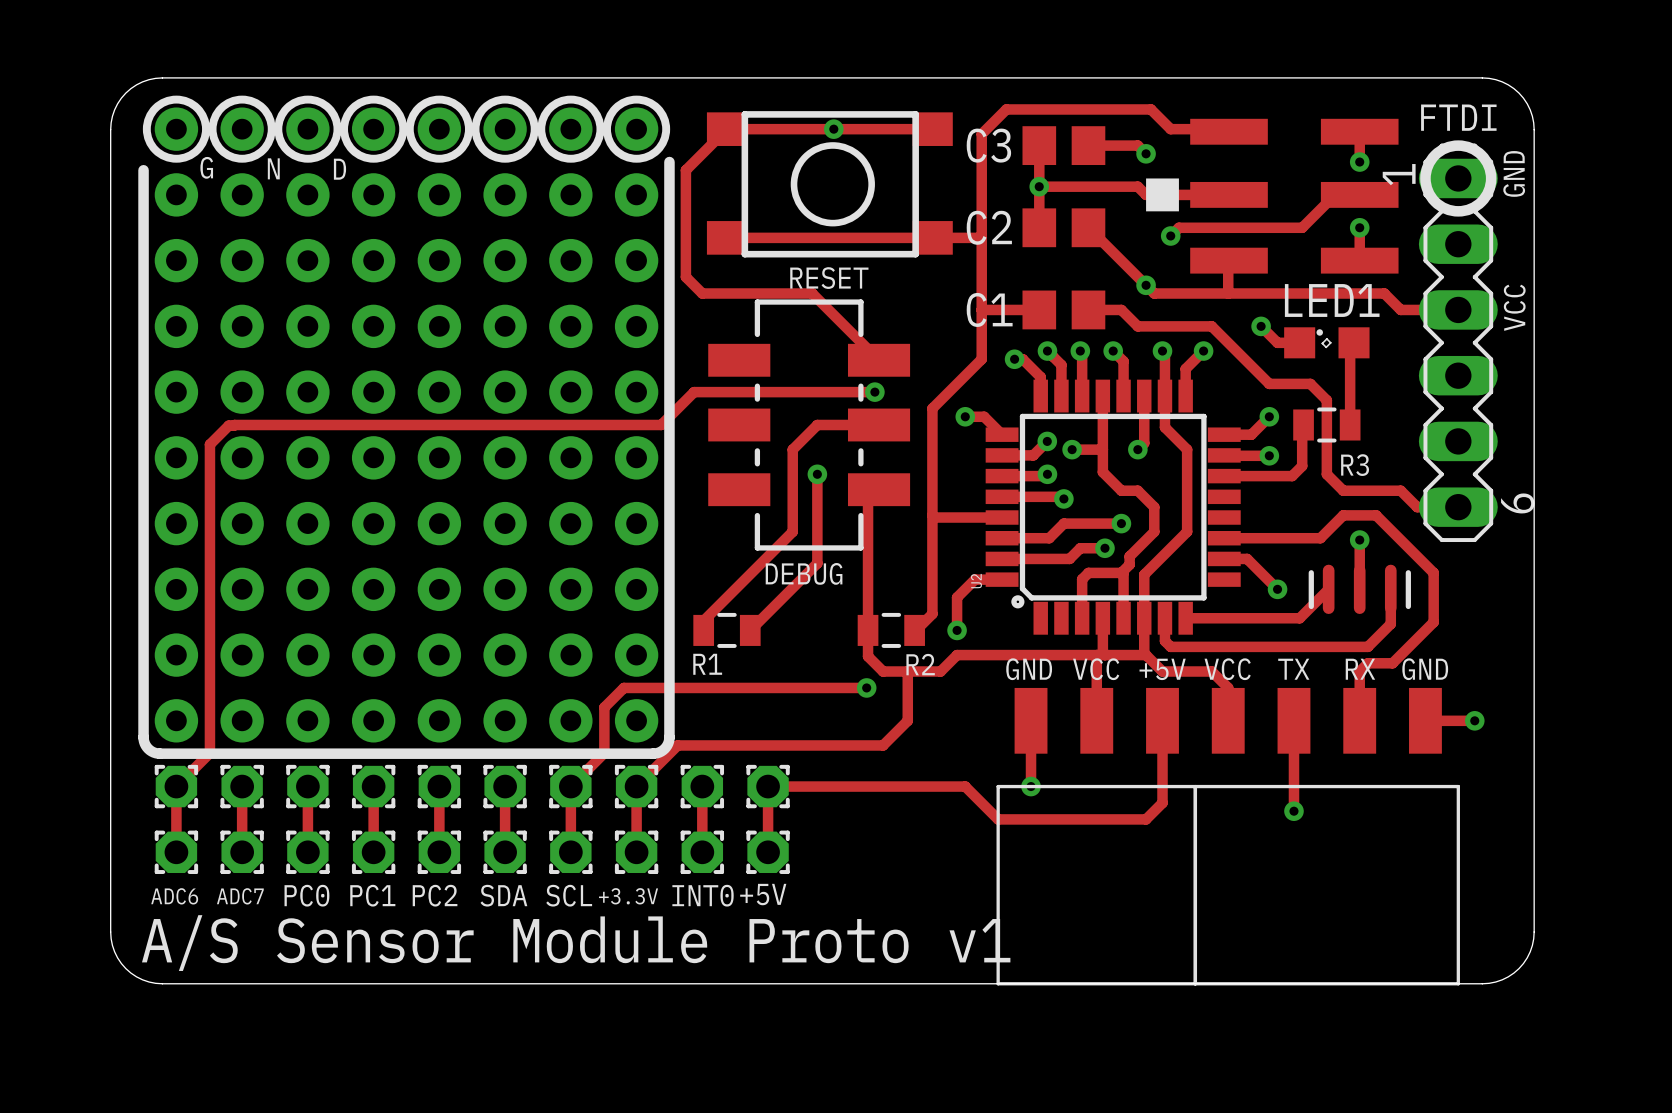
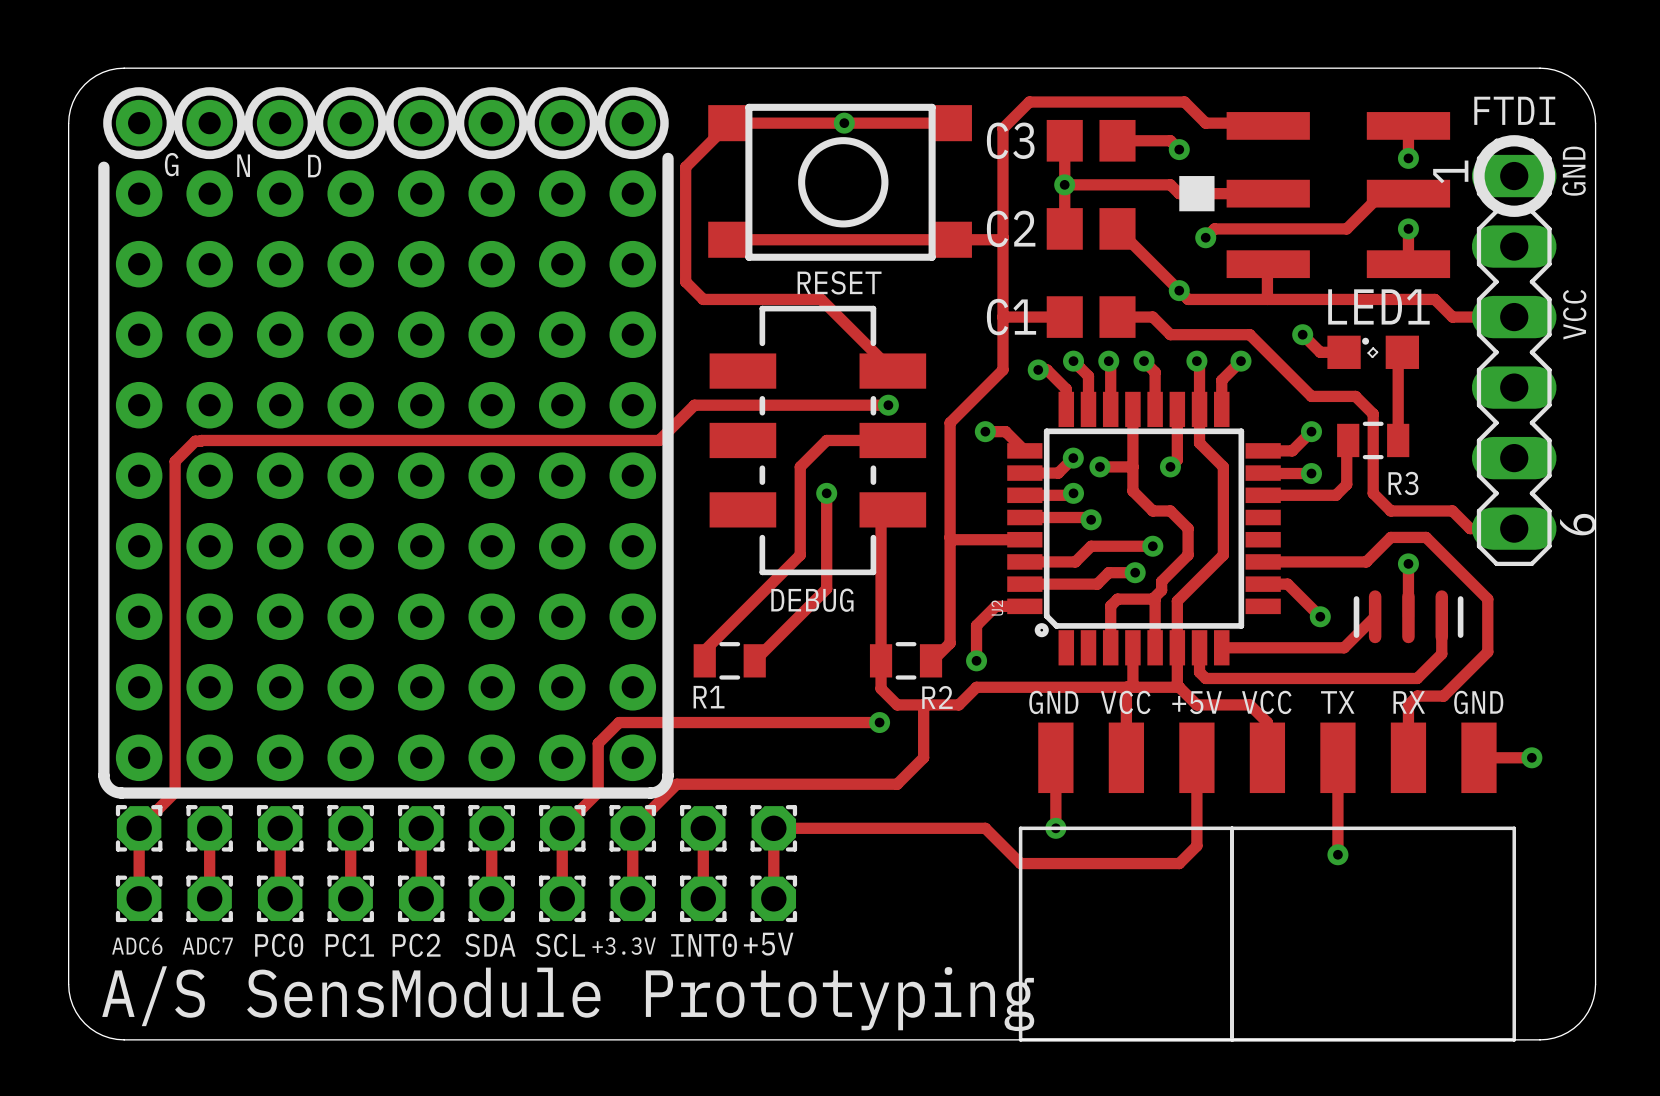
text: A/S Sensor Module Proto v1 (576, 943) -> A/S SensModule Prototyping (568, 998)

